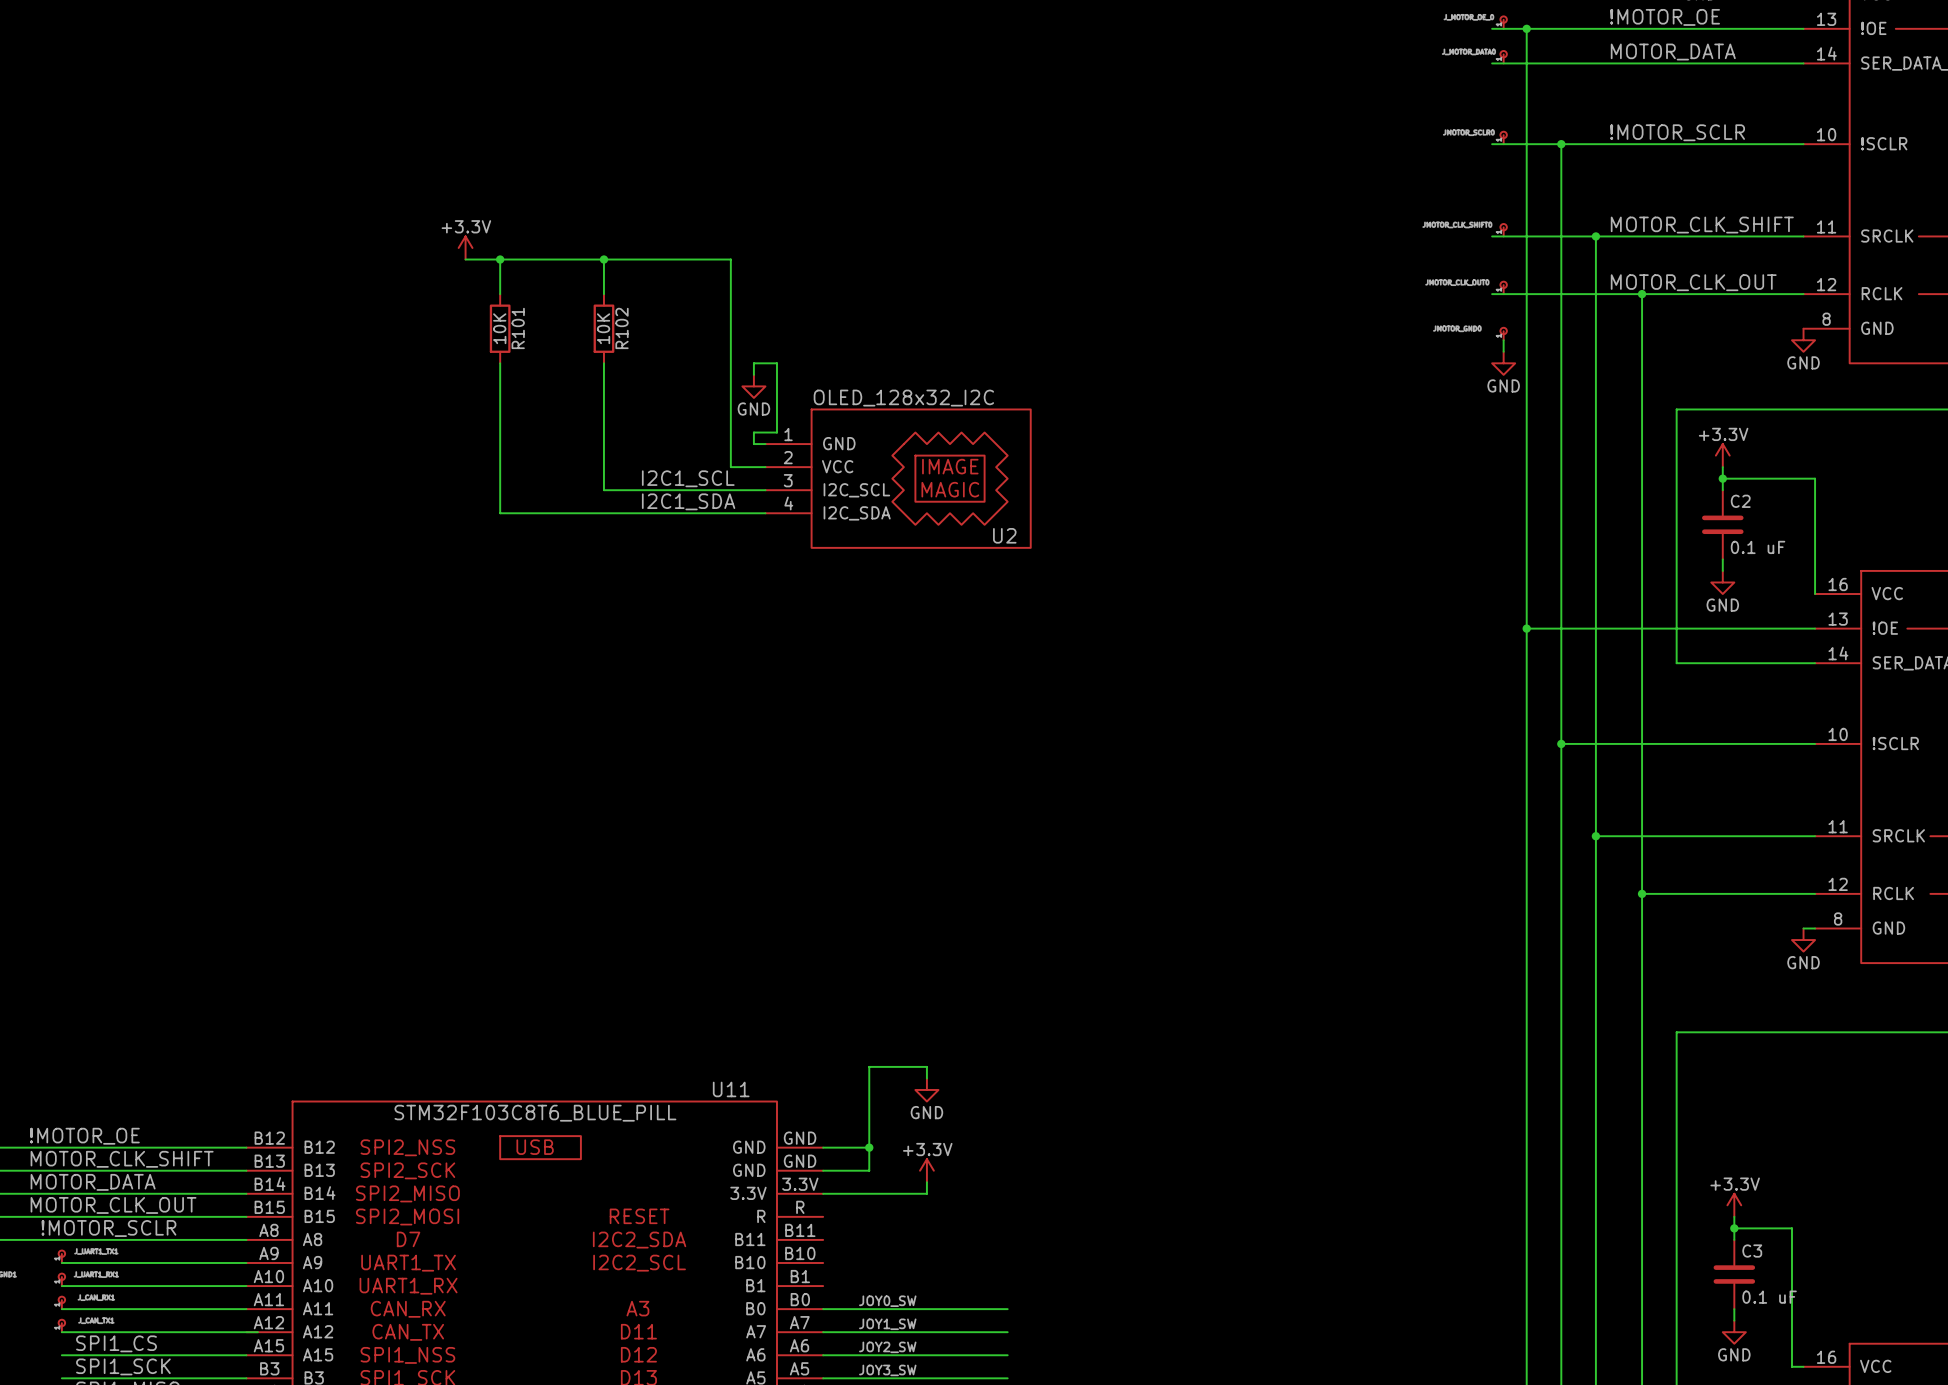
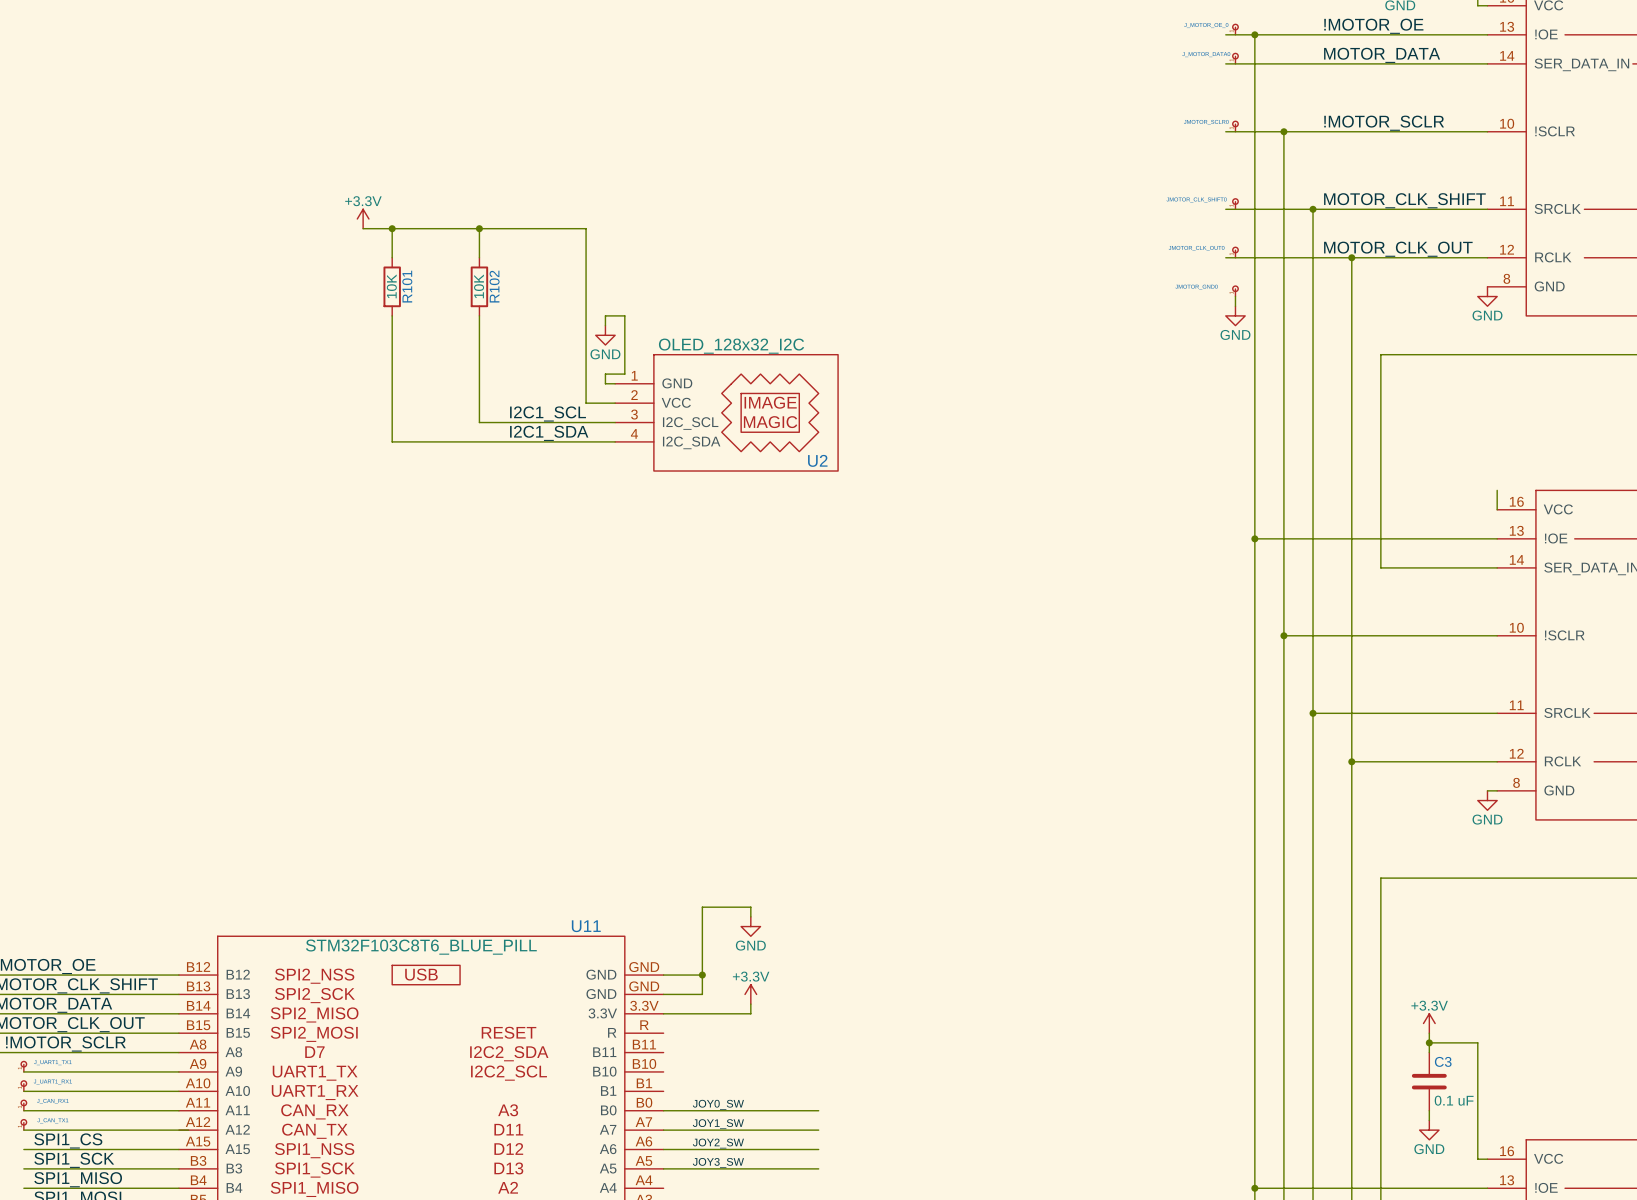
power symbol: +3.3V (1722, 455) -> none
wire: (1722, 467) (1722, 490) -> none
wire: (1722, 478) (1815, 478) (1815, 570) -> none
junction: (1722, 478) -> none
C2: 0.1 uF (1722, 524) -> none
wire: (1722, 559) (1722, 570) -> none
power symbol: GND (1722, 582) -> none

